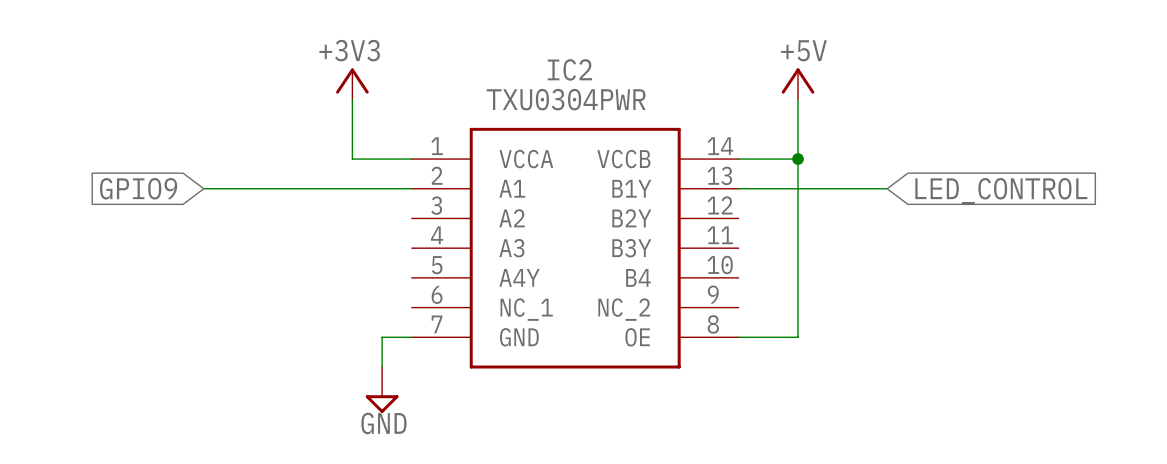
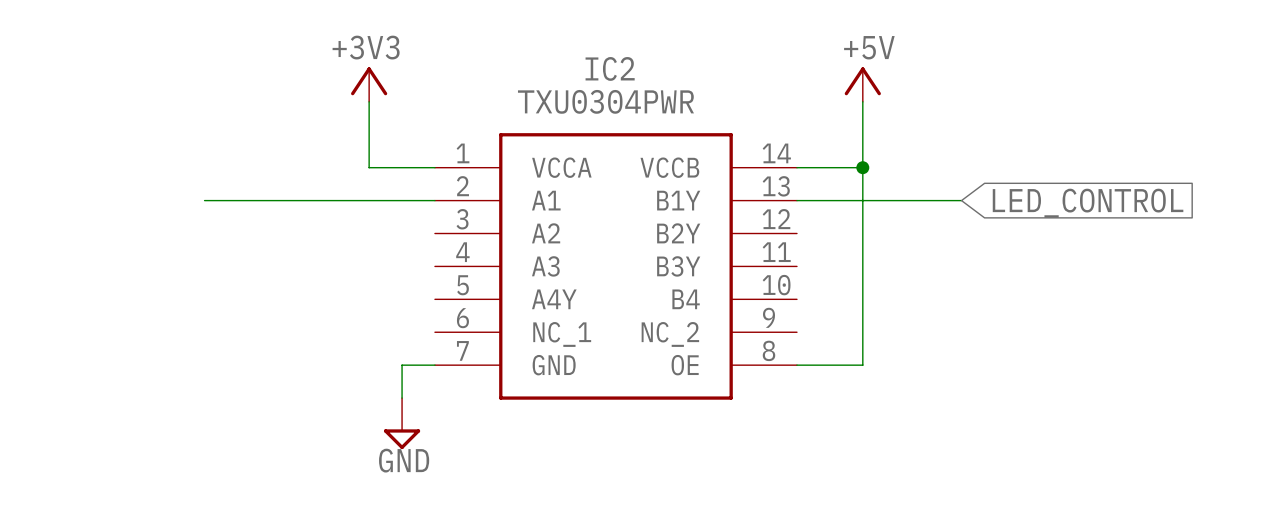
global label: GPIO9 (138, 188) -> none

